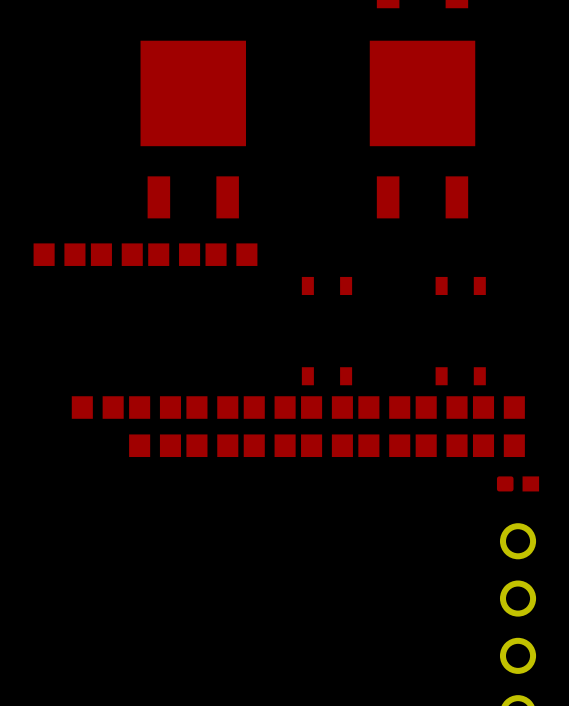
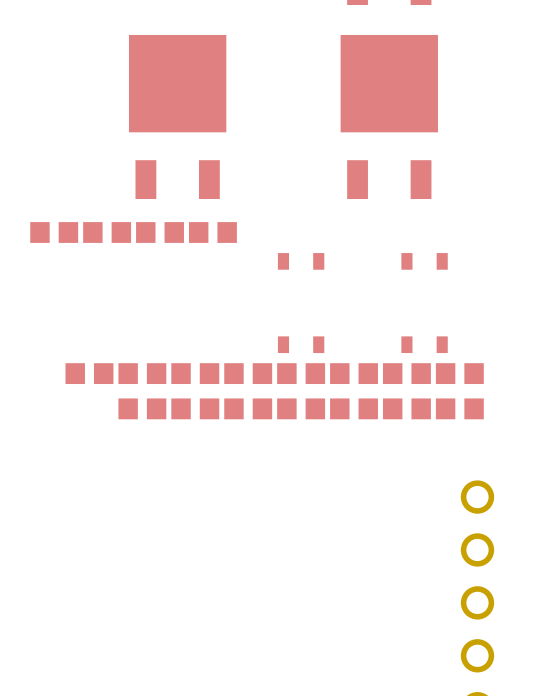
part: (518, 483) -> none

